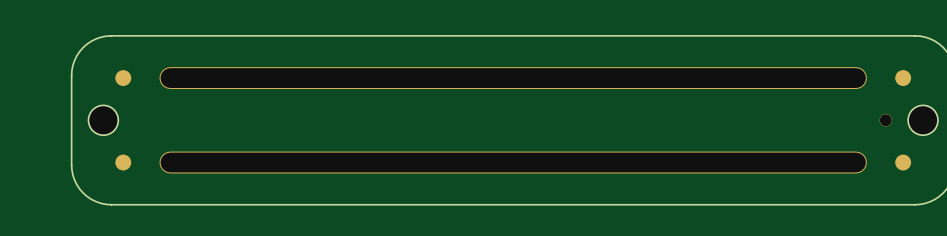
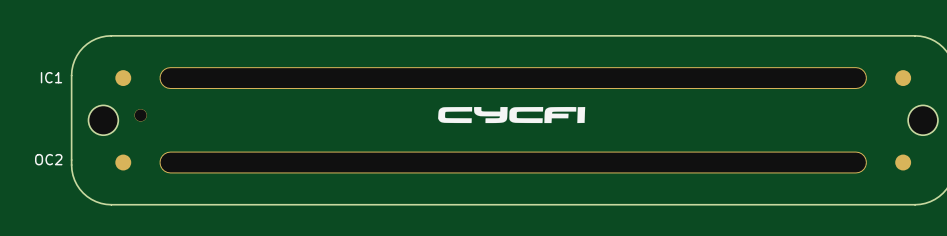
IC1 name: none -> IC1 (51, 77)
drawing: none -> [438, 106, 586, 124]
part: none -> (140, 115)
part: (885, 120) -> none
OC2 name: none -> OC2 (48, 159)

